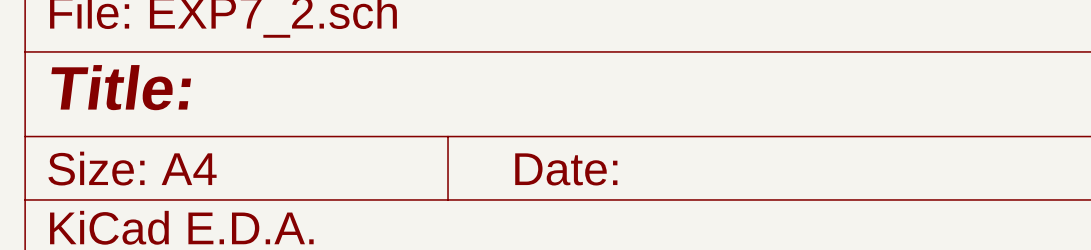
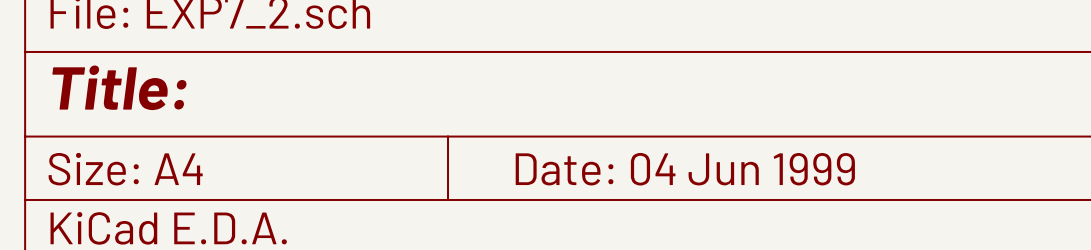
title block: Date: (566, 169) -> Date: 04 Jun 1999 (685, 169)

